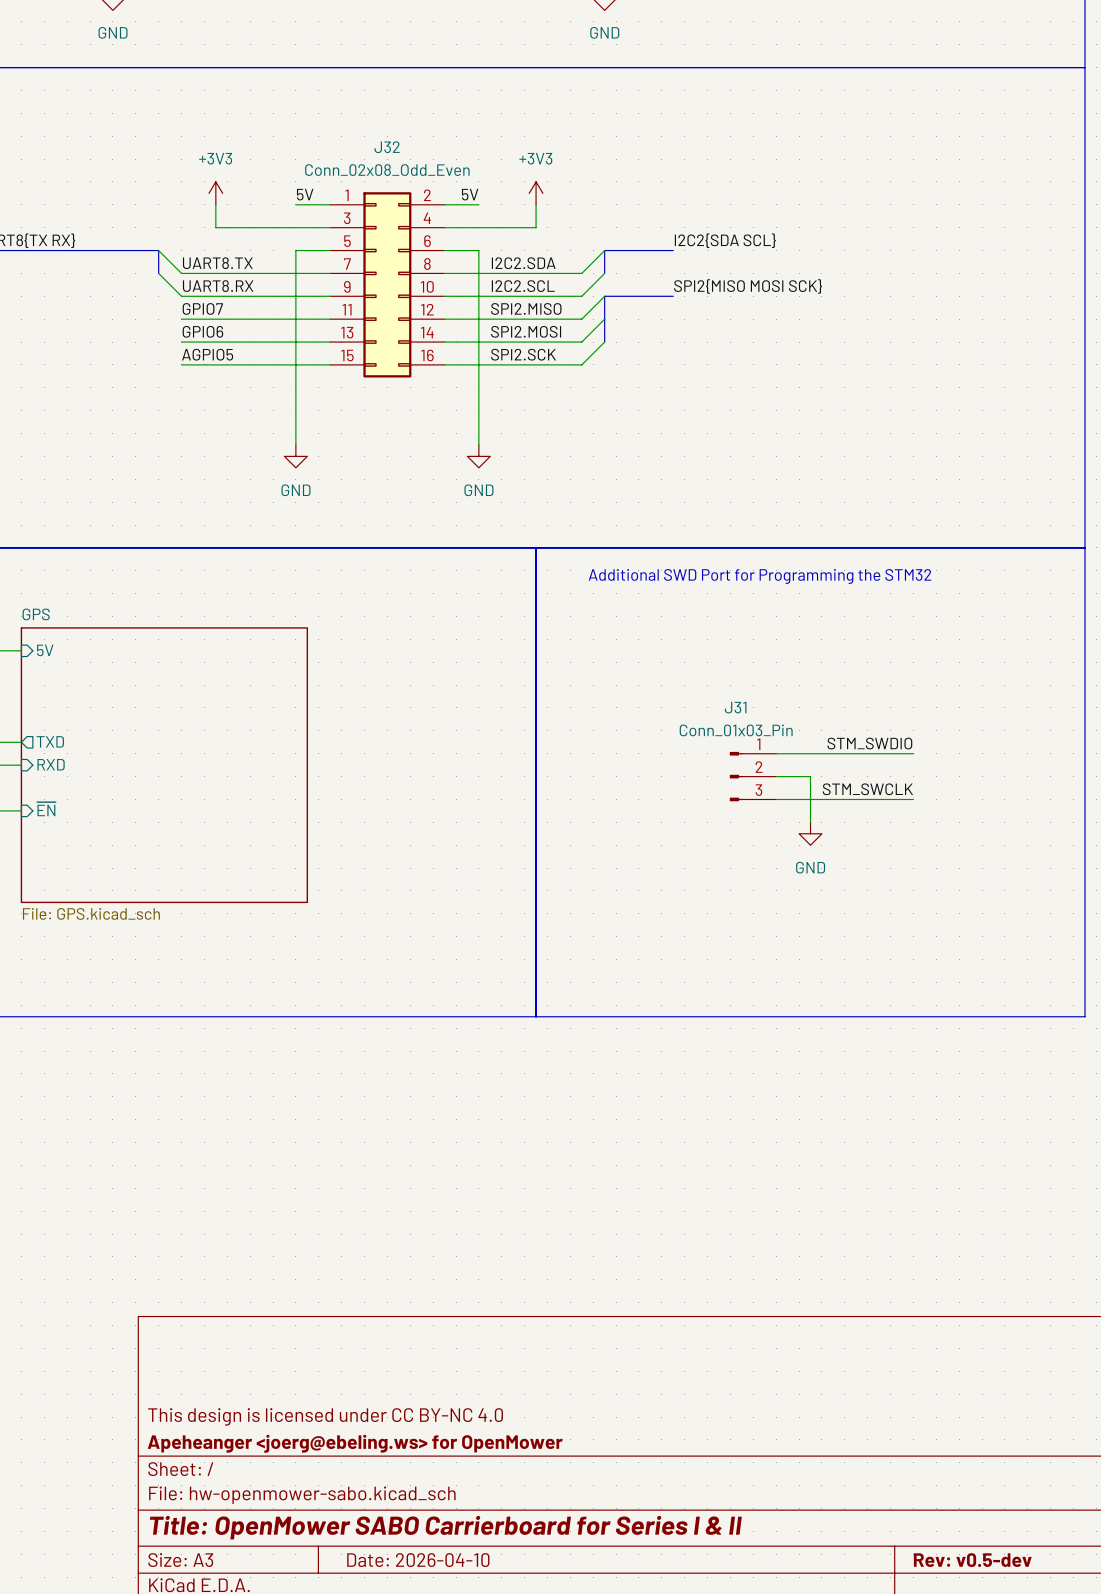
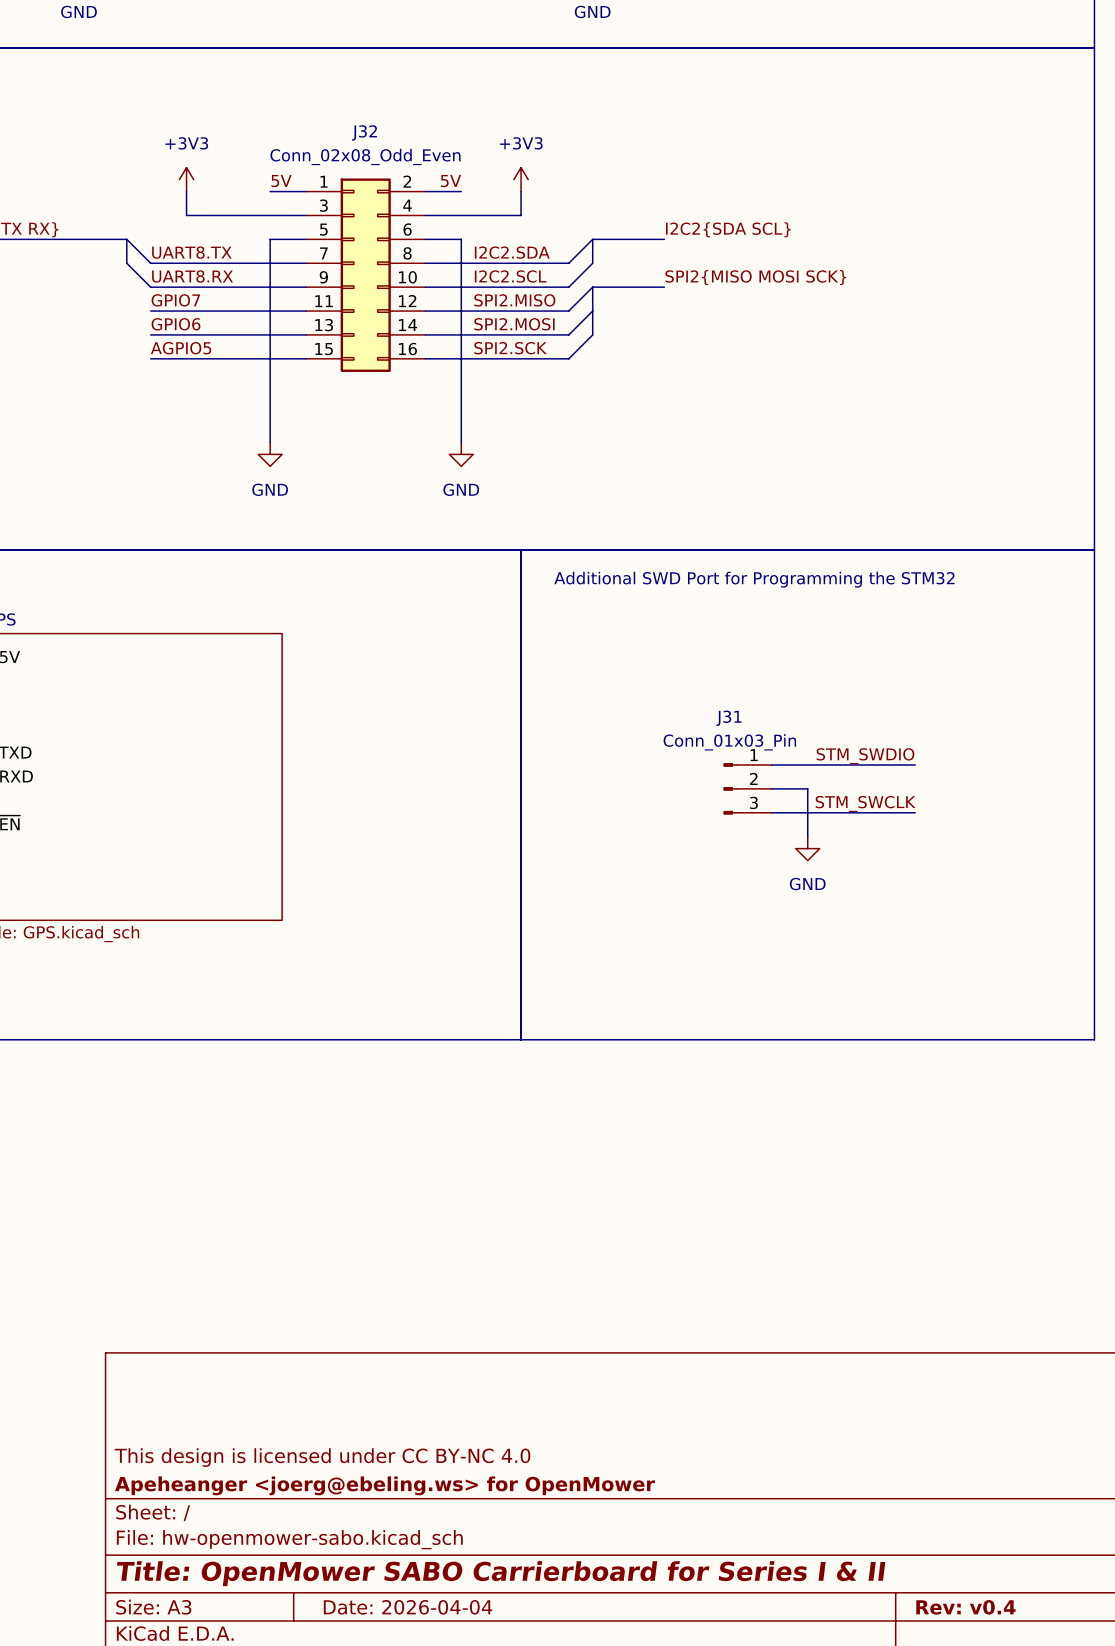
title block: Date: 2026-04-10 (418, 1560) -> Date: 2026-04-04 (408, 1607)
title block: Rev: v0.5-dev (972, 1560) -> Rev: v0.4 (965, 1607)

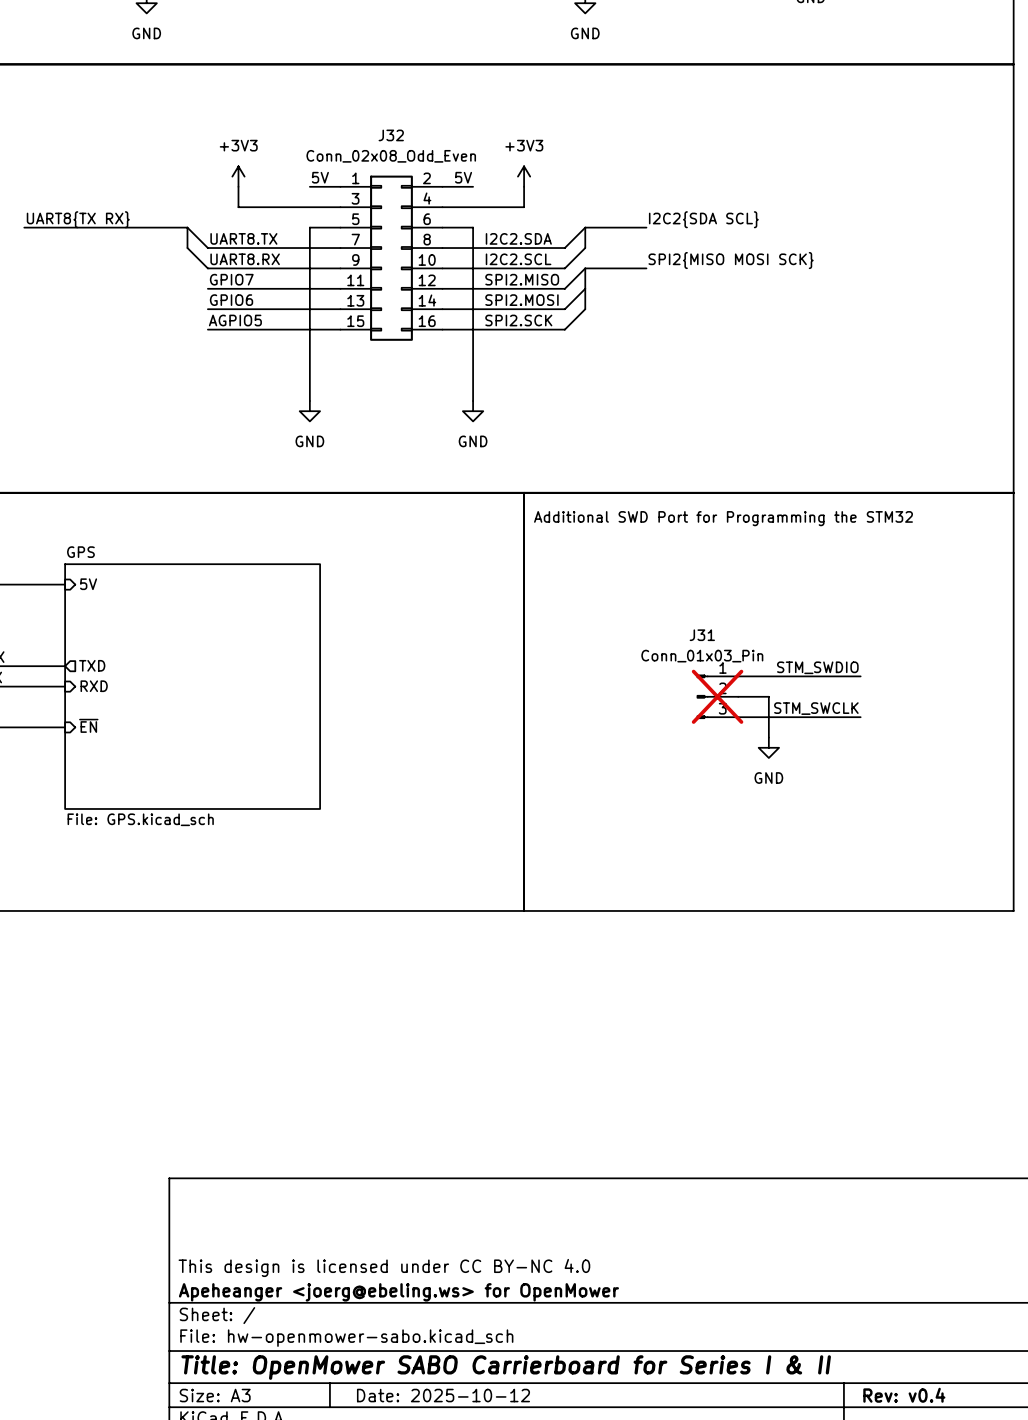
J31 do-not-place cross: none -> (717, 696)
title block: Date: 2026-04-04 (408, 1607) -> Date: 2025-10-12 (443, 1395)

